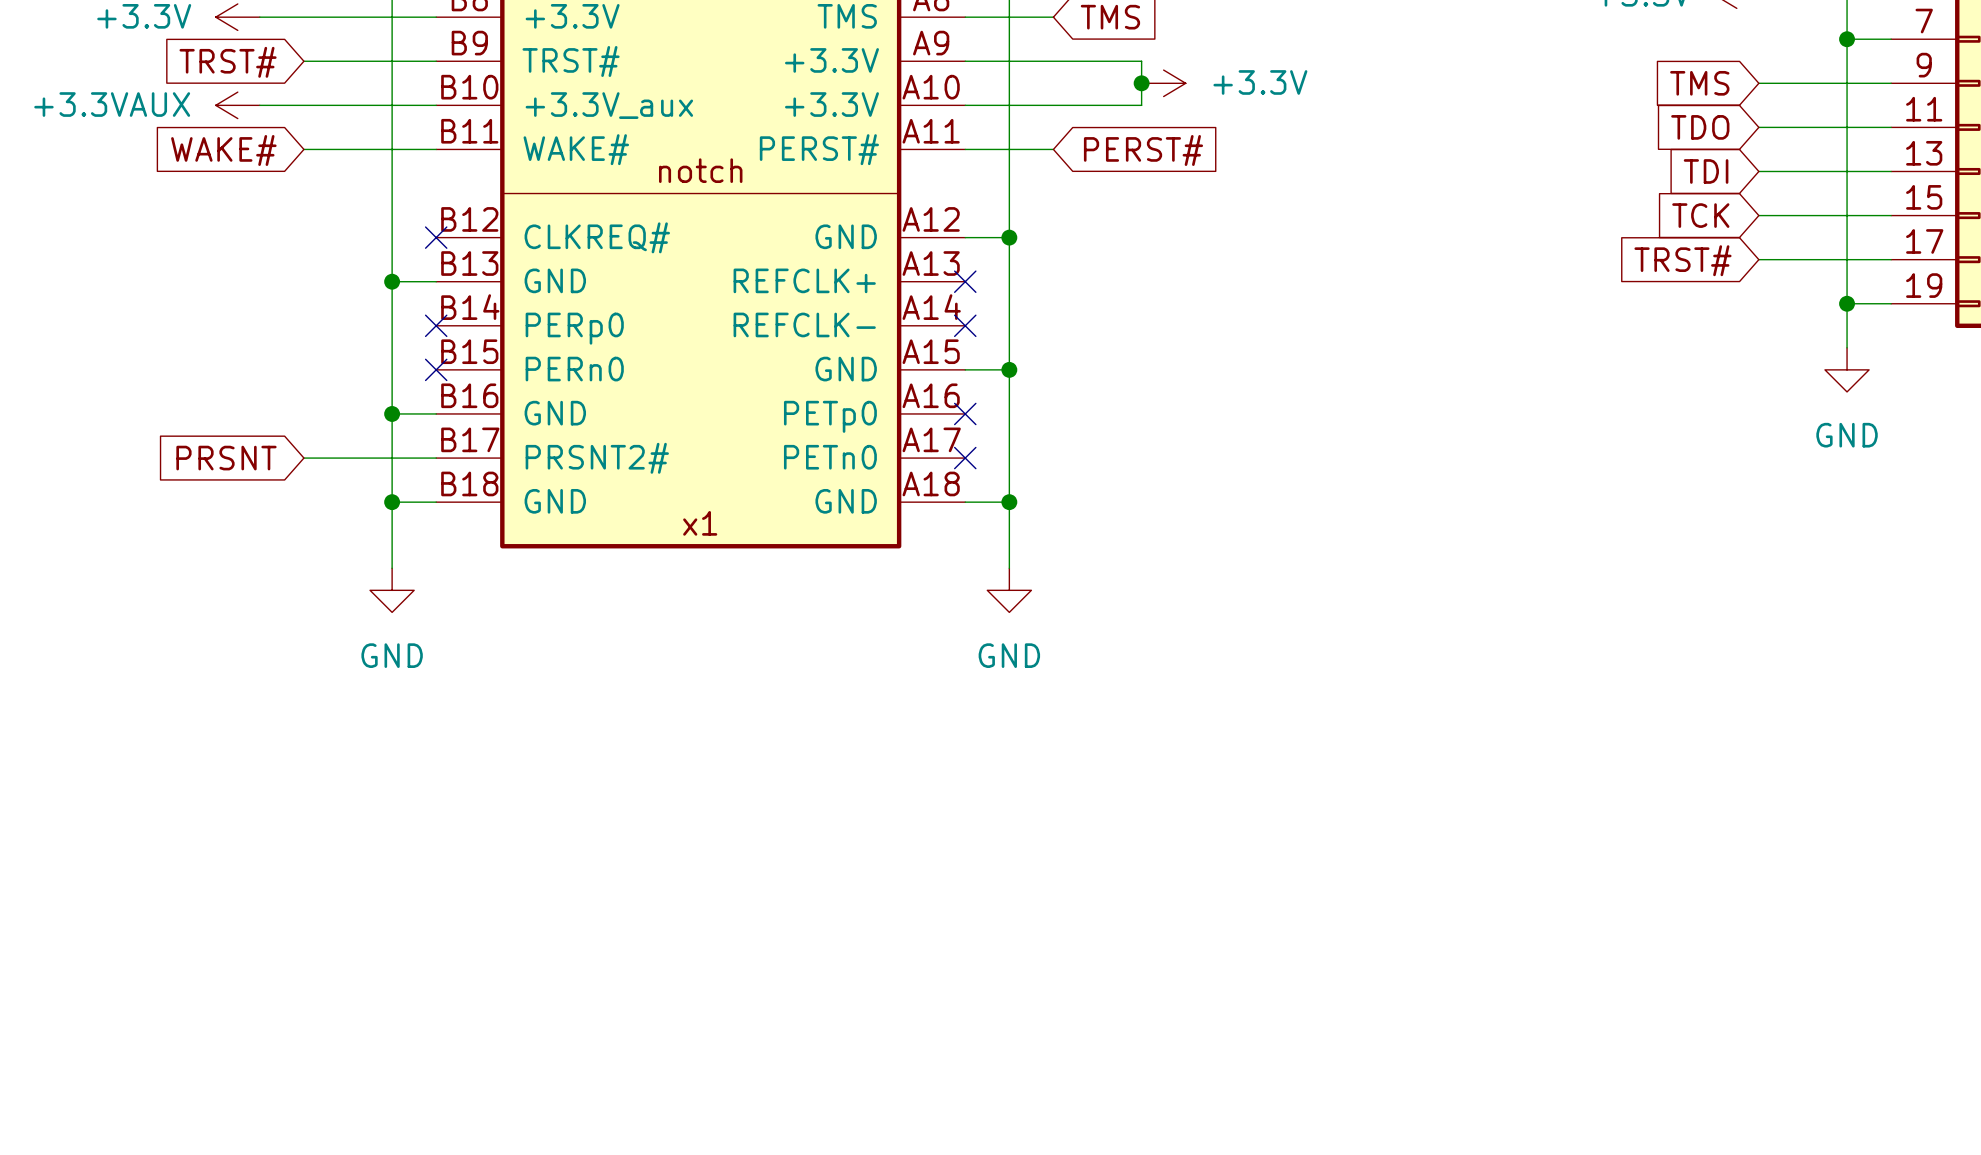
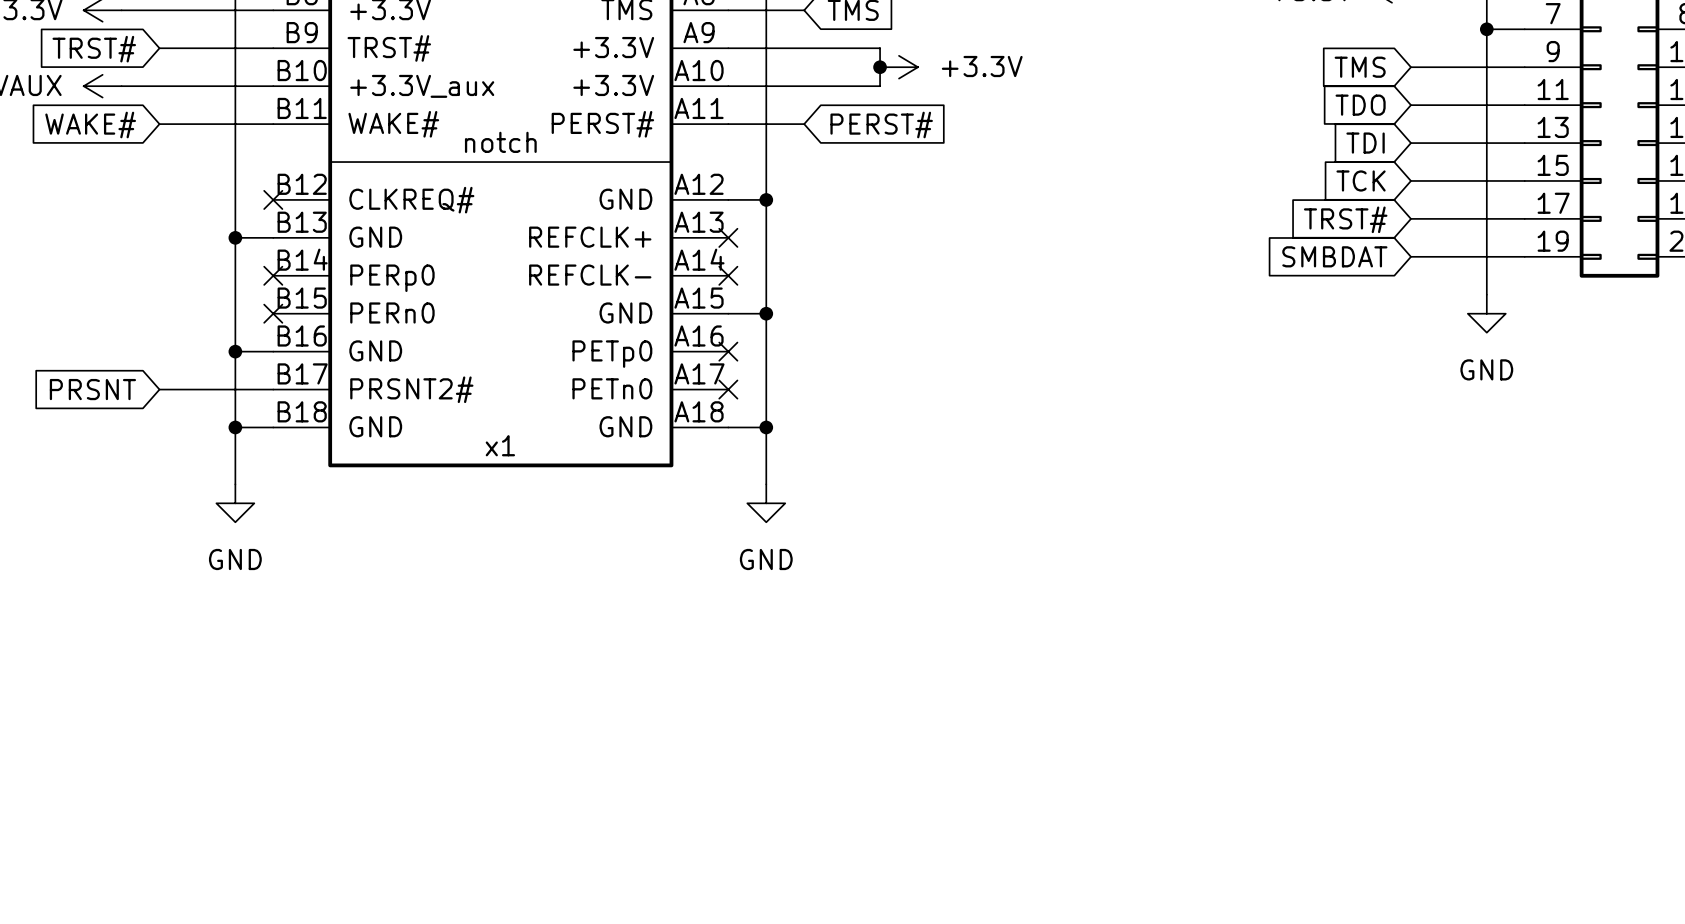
global label: none -> SMBDAT (1334, 256)
wire: none -> (1410, 256) (1486, 256)
junction: (1847, 303) -> none

